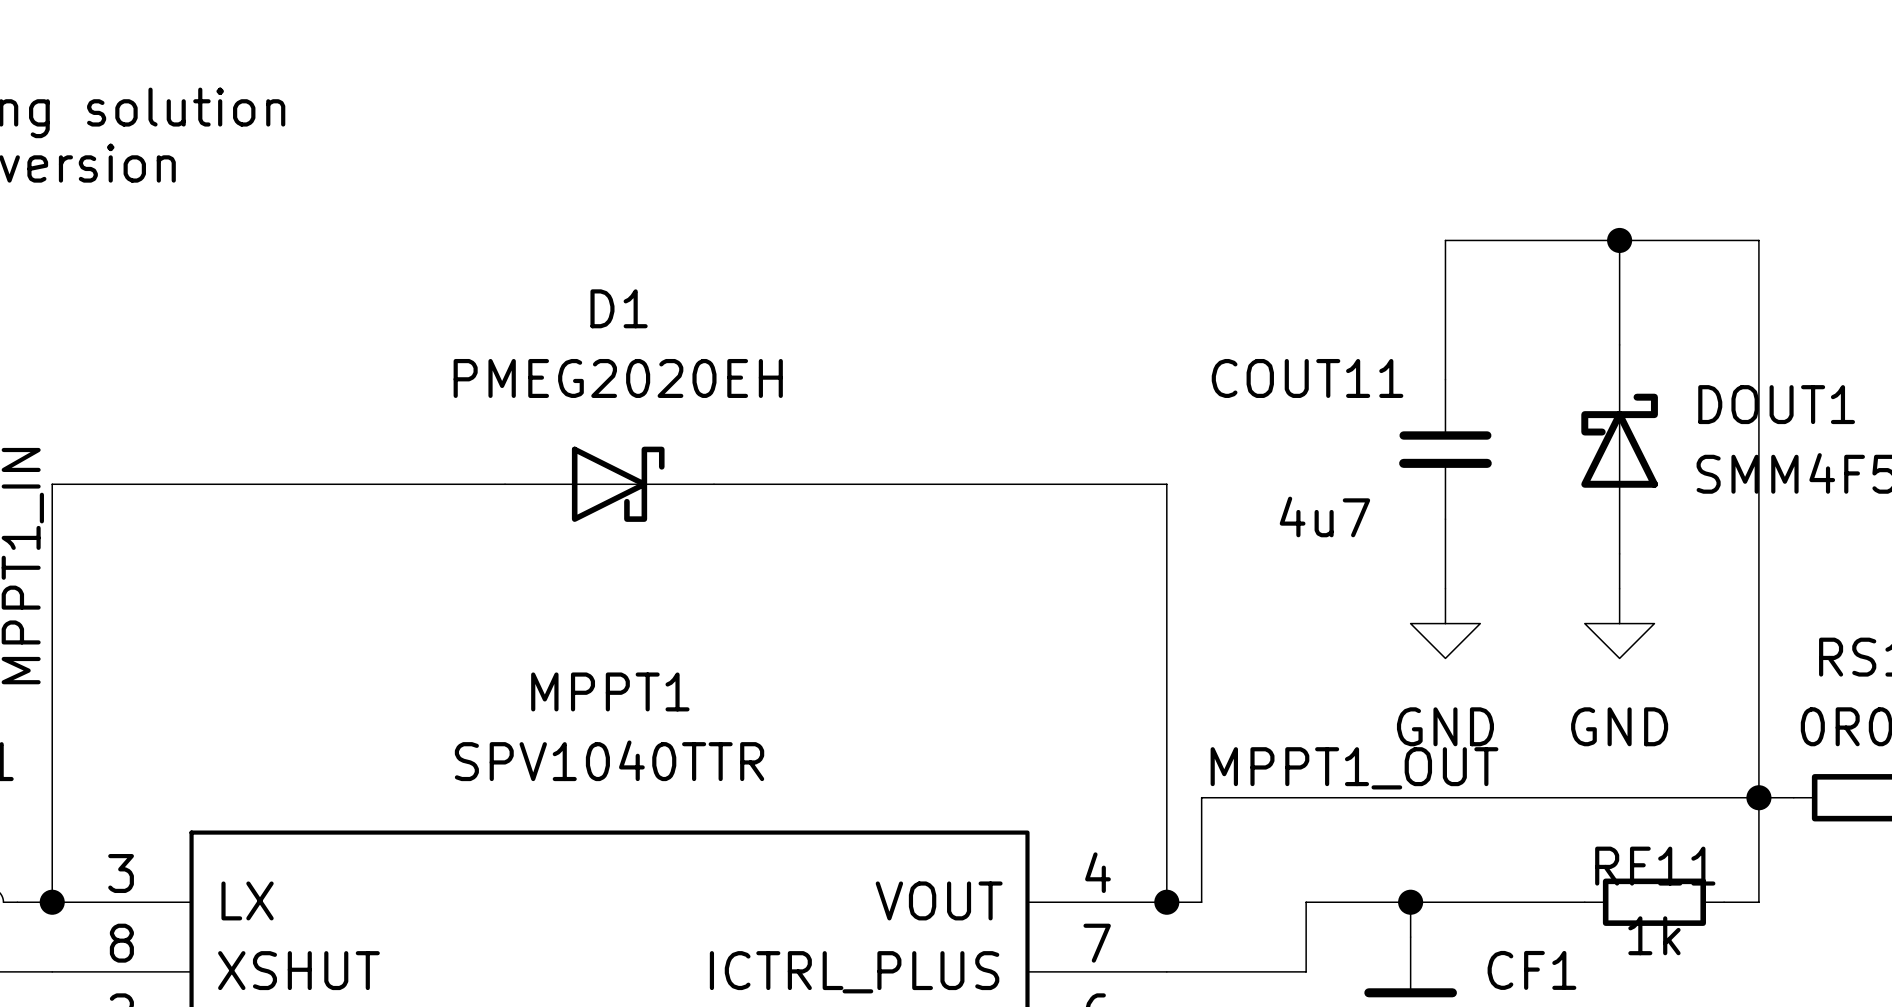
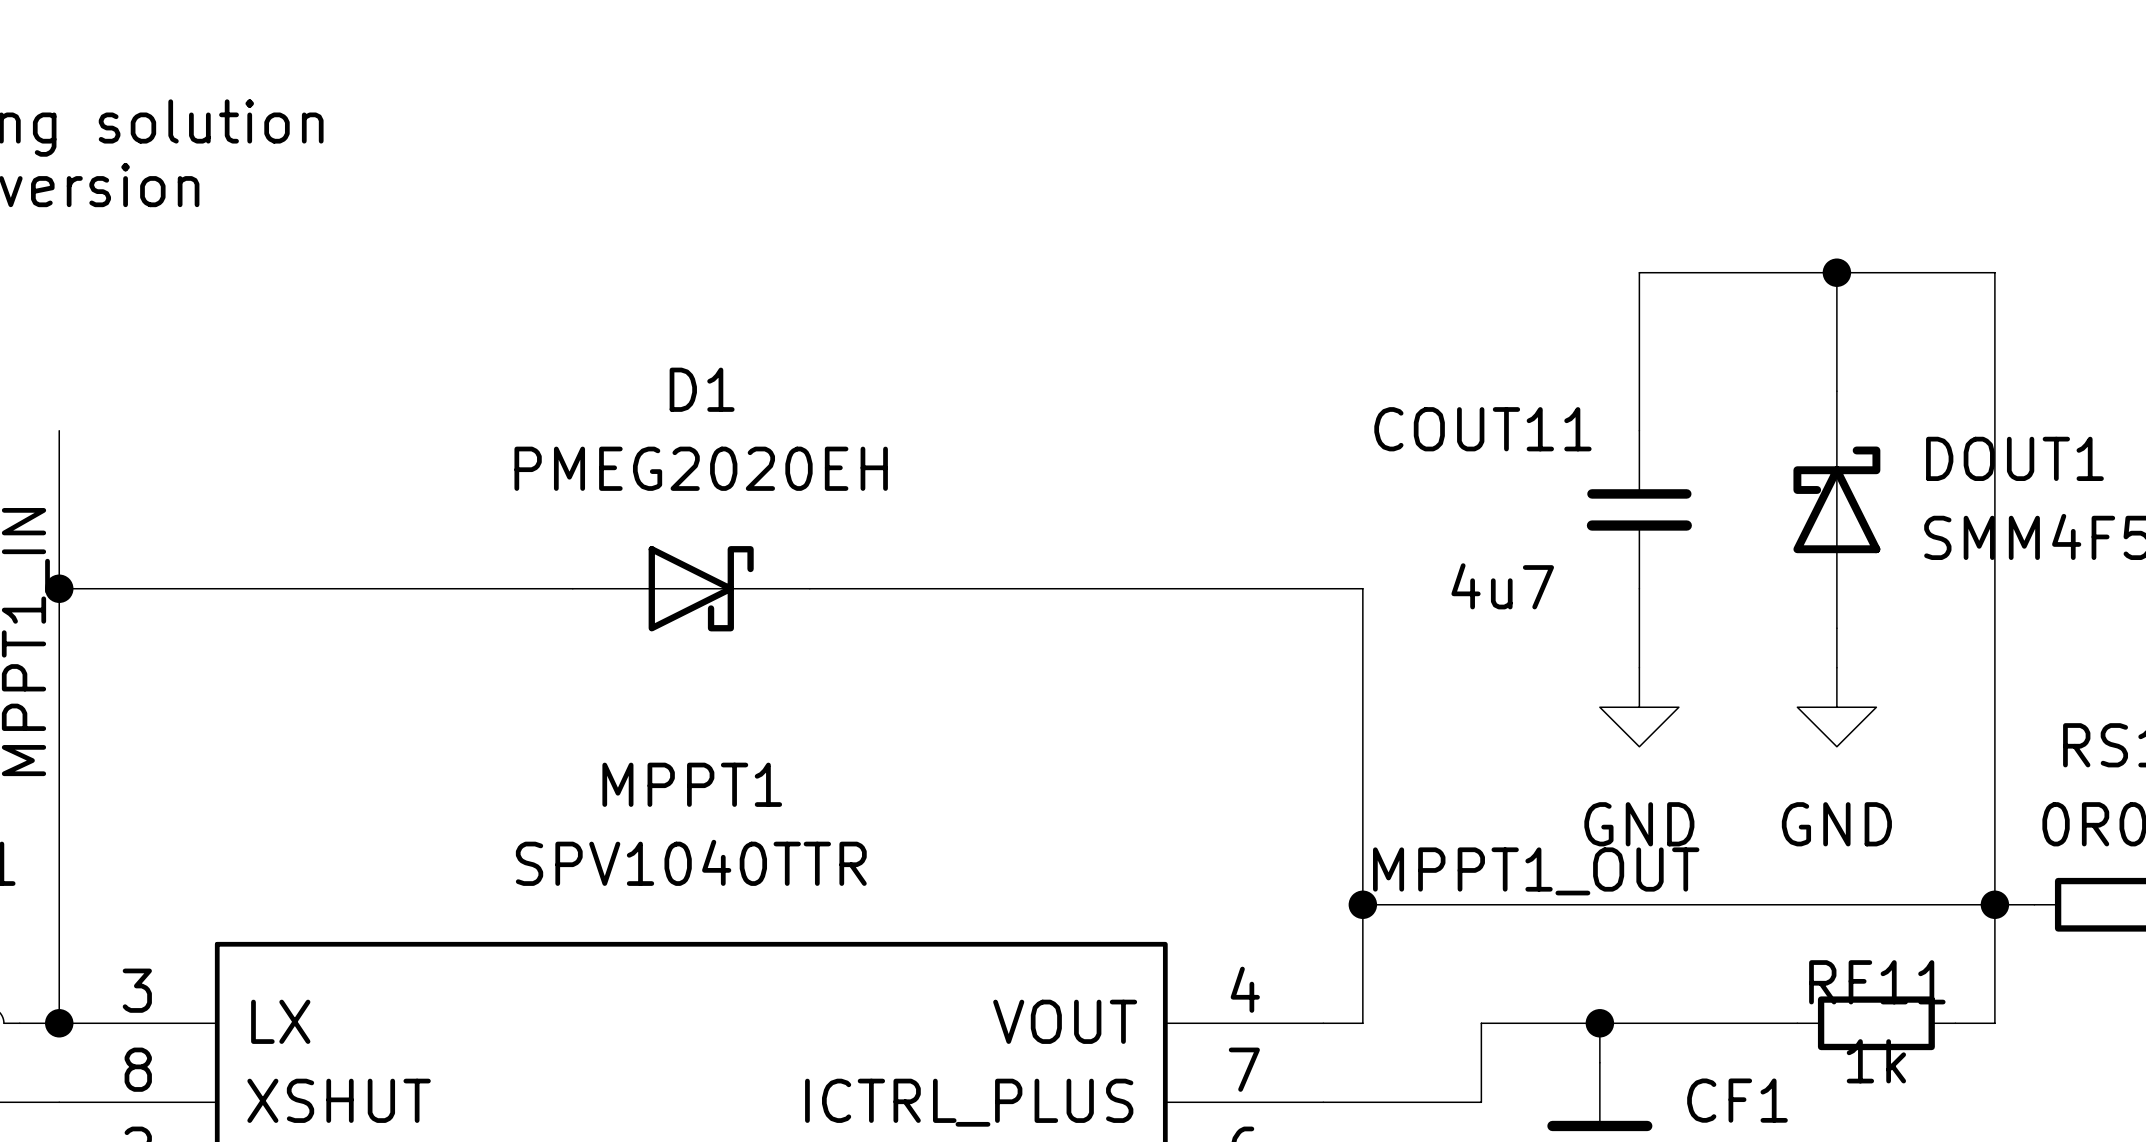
wire: (52, 484) (505, 484) -> (59, 549) (59, 430)
D1 position: (609, 484) -> (691, 588)
wire: (714, 484) (1166, 484) (1166, 902) -> none
wire: none -> (59, 588) (572, 588)
junction: none -> (59, 588)
wire: none -> (809, 588) (1362, 588) (1362, 904)
junction position: (1166, 902) -> (1362, 904)

